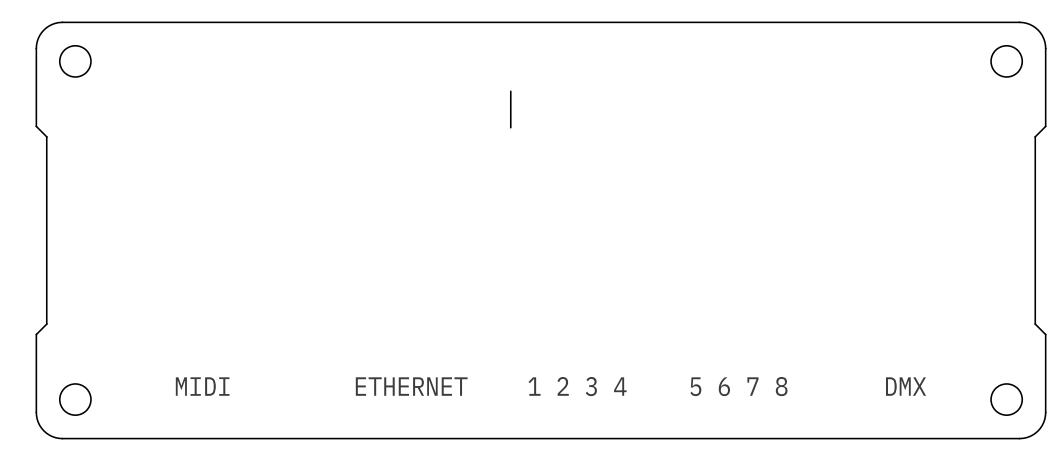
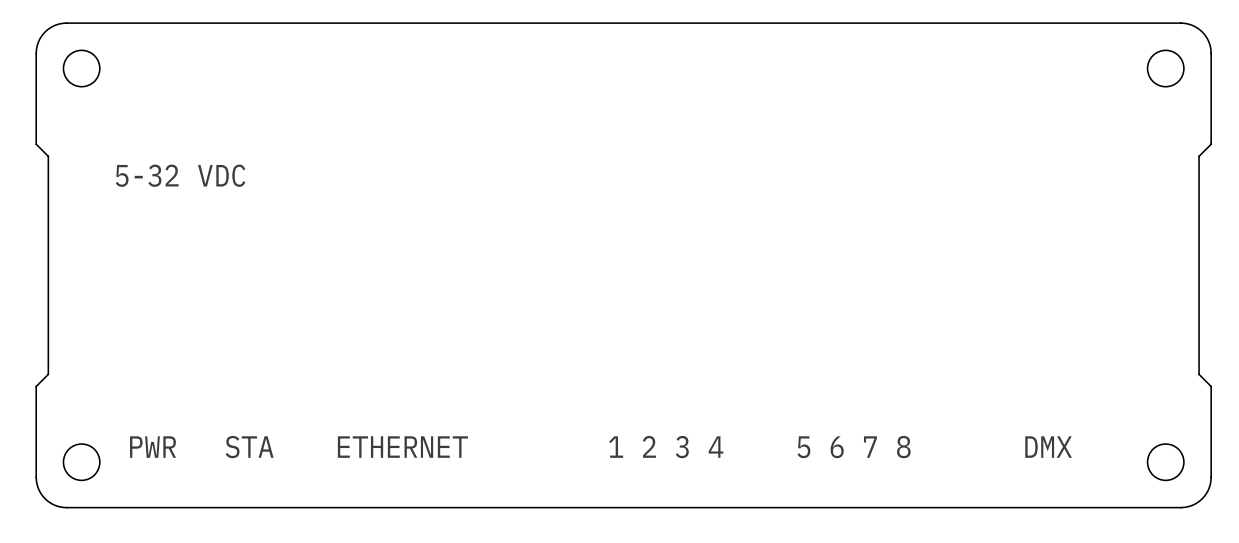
drawing: [510, 90, 512, 129] -> none
text: none -> 5-32 VDC (180, 175)
text: none -> PWR (153, 447)
text: MIDI (202, 386) -> none
text: none -> STA (249, 447)
text position: ETHERNET (411, 386) -> ETHERNET (402, 447)

